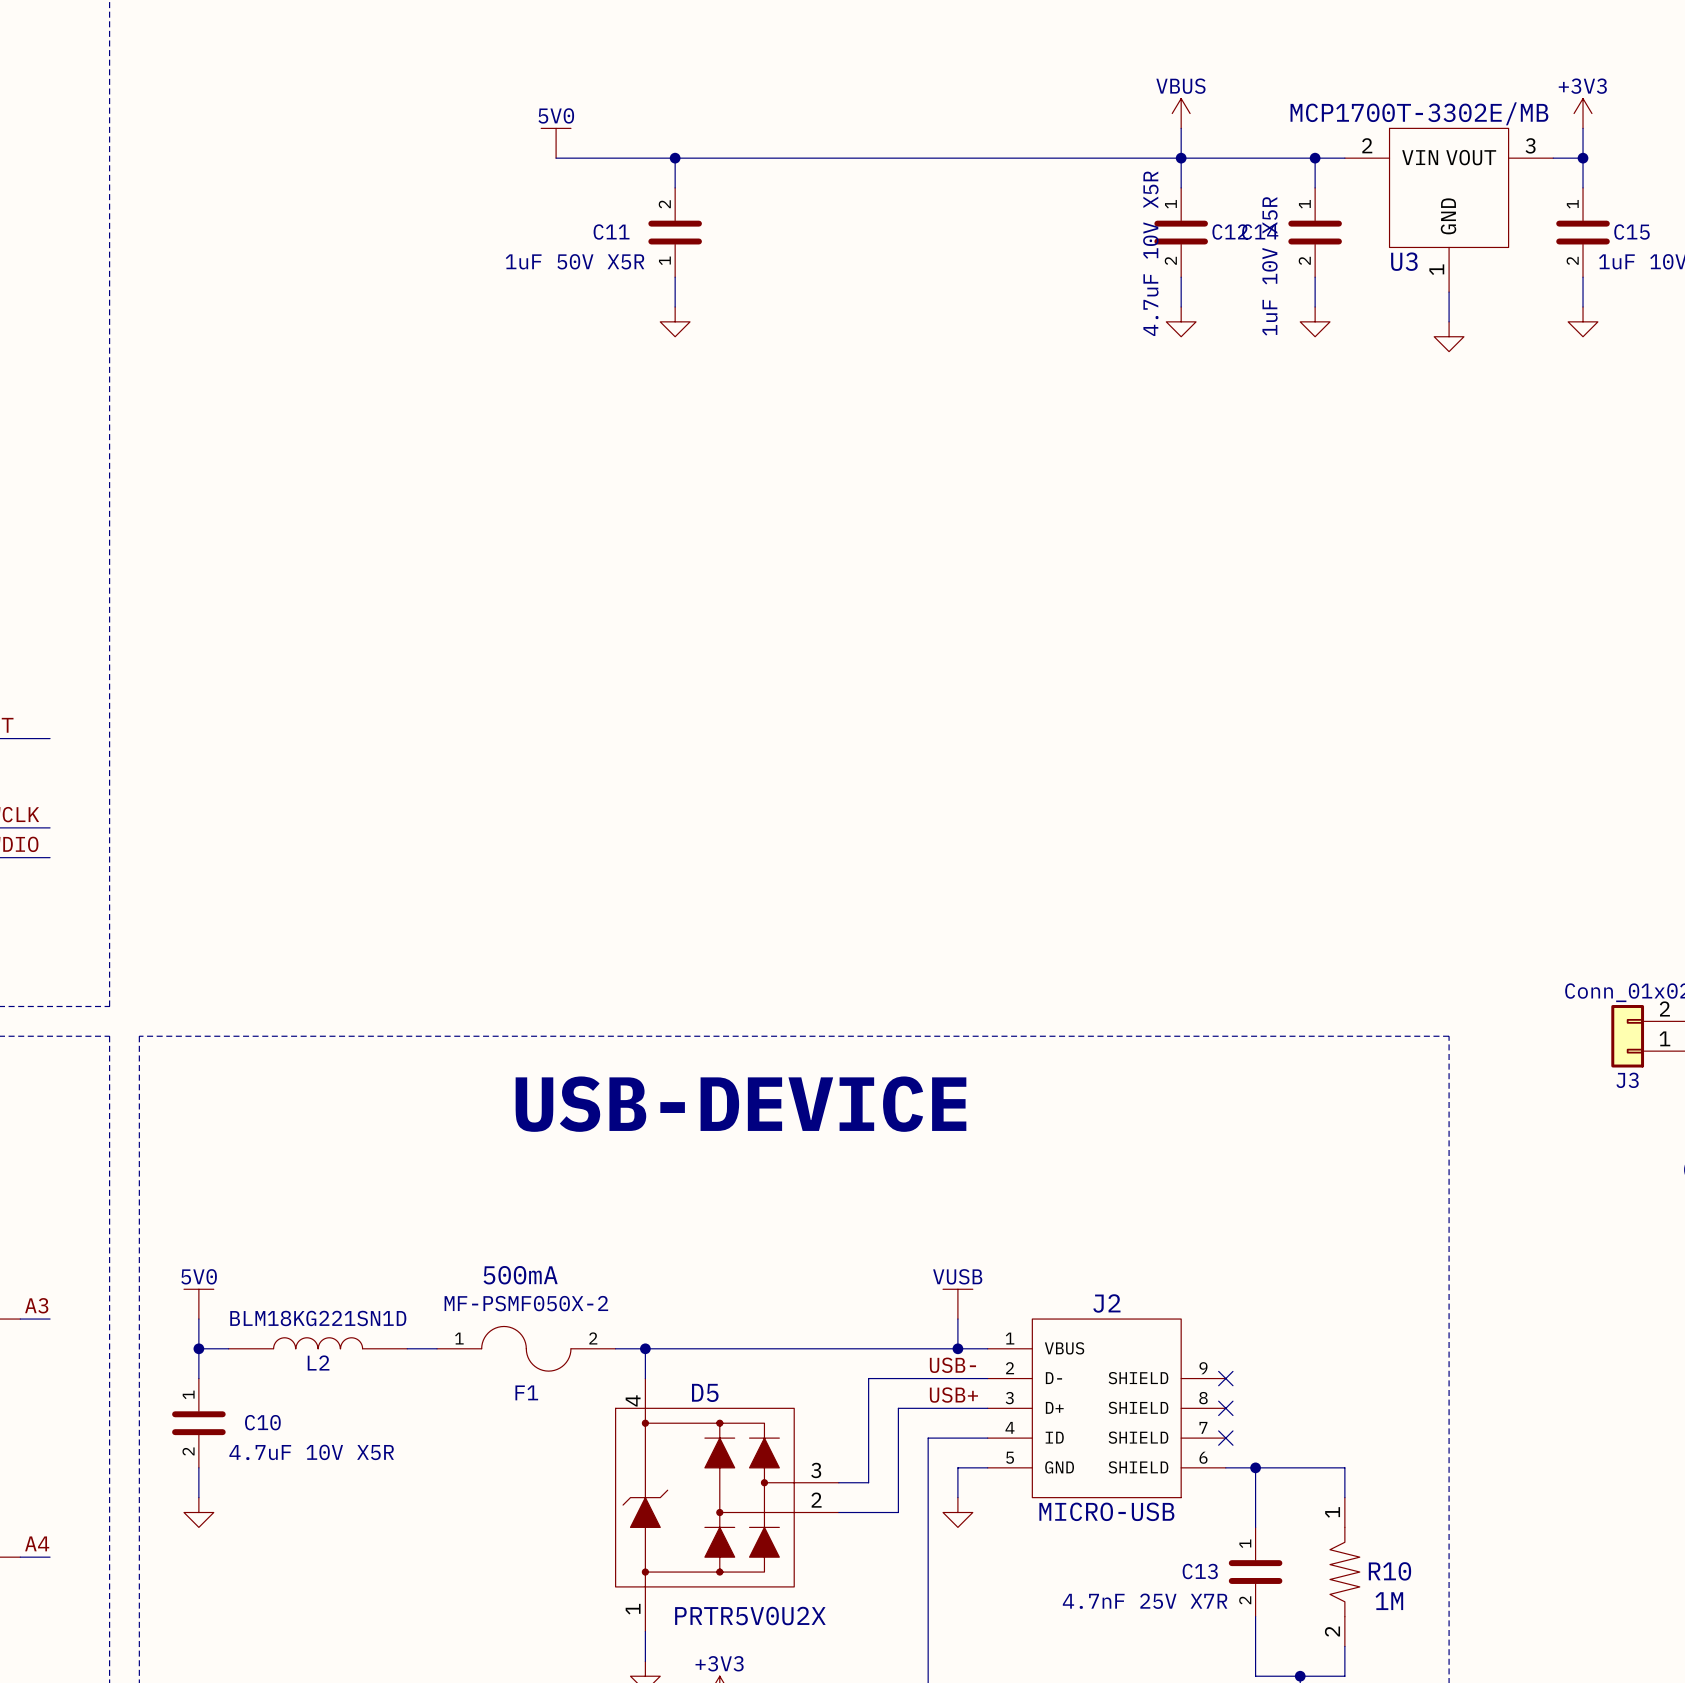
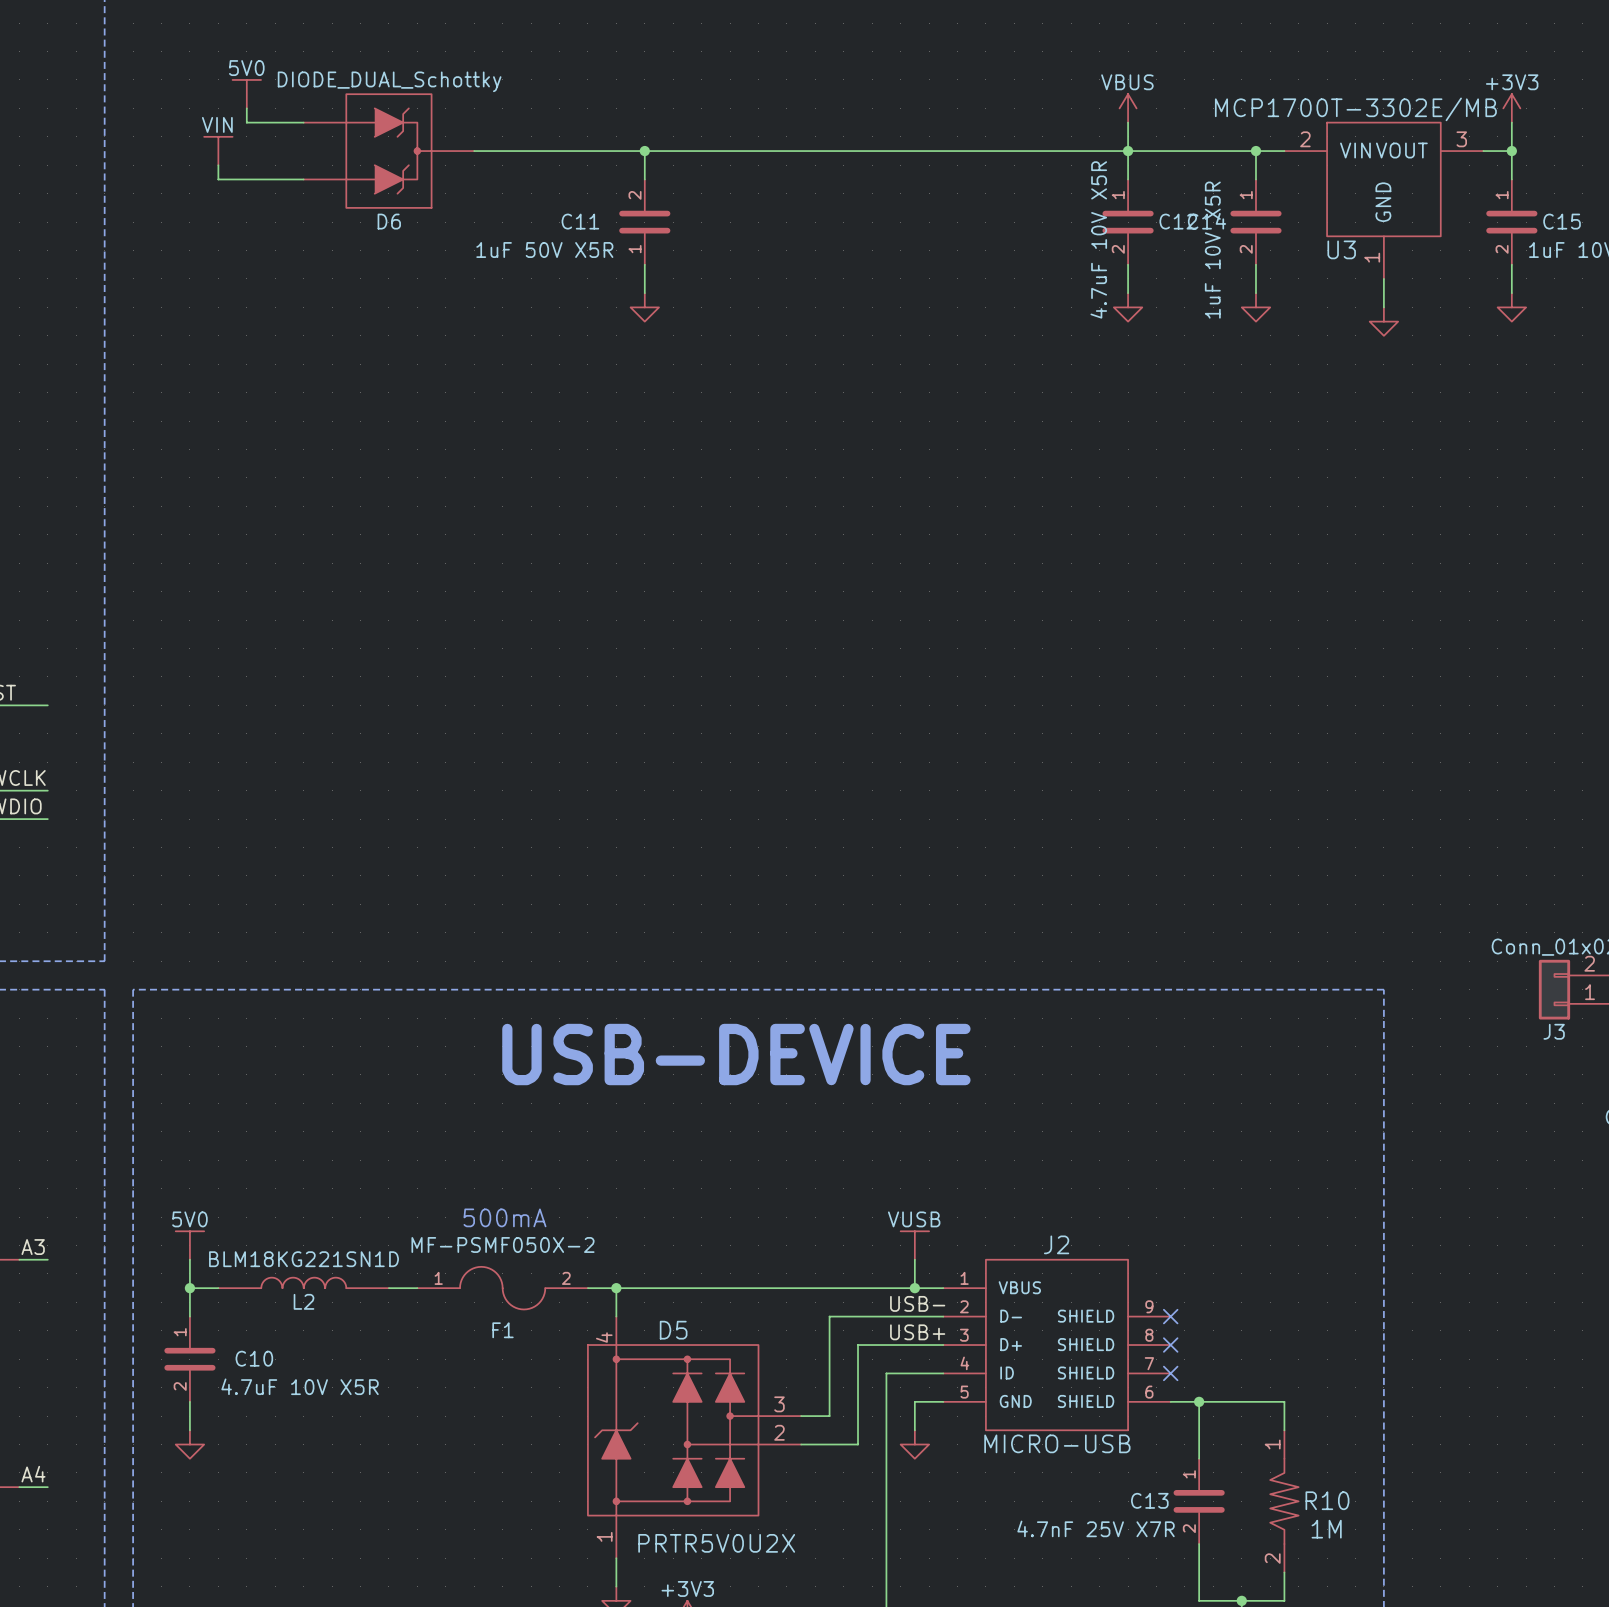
power symbol: none -> 5V0 (246, 94)
wire: none -> (246, 108) (246, 122) (303, 122)
power symbol: 5V0 (556, 143) -> none
power symbol: none -> VIN (218, 151)
D6: none -> DIODE_DUAL_Schottky (388, 151)
wire: none -> (474, 151) (531, 151)
wire: none -> (218, 165) (218, 179) (303, 179)

